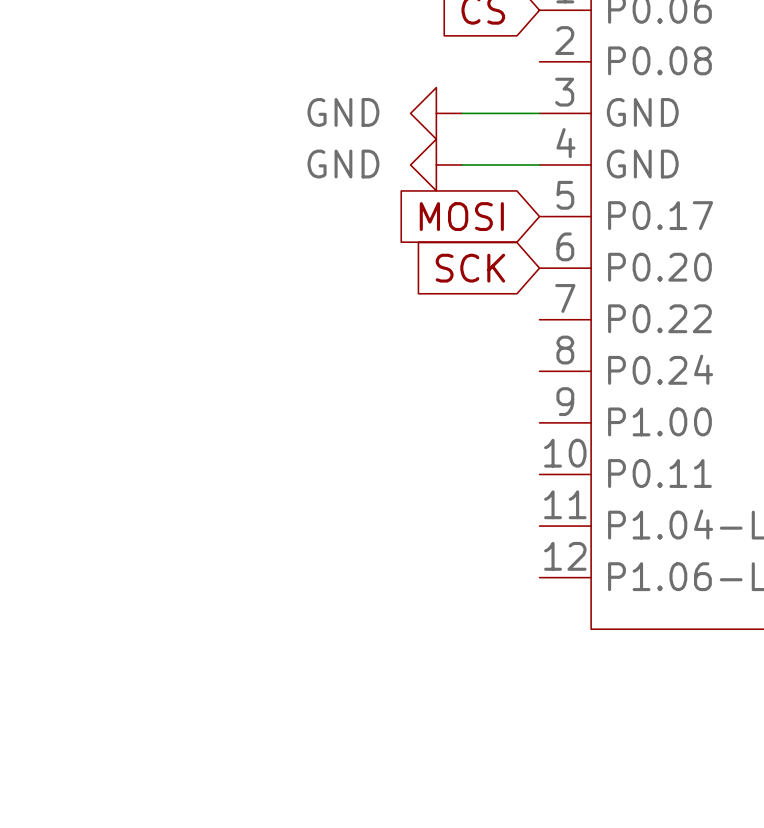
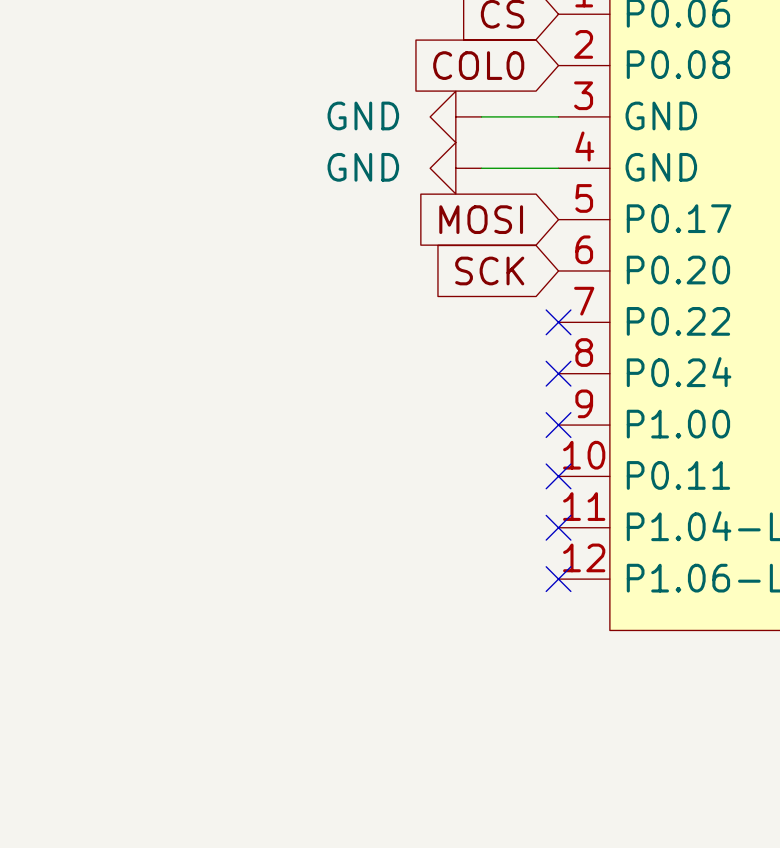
global label: none -> COL0 (478, 65)
no-connect mark: none -> (558, 322)
no-connect mark: none -> (558, 373)
no-connect mark: none -> (558, 425)
no-connect mark: none -> (558, 476)
no-connect mark: none -> (558, 527)
no-connect mark: none -> (558, 579)

